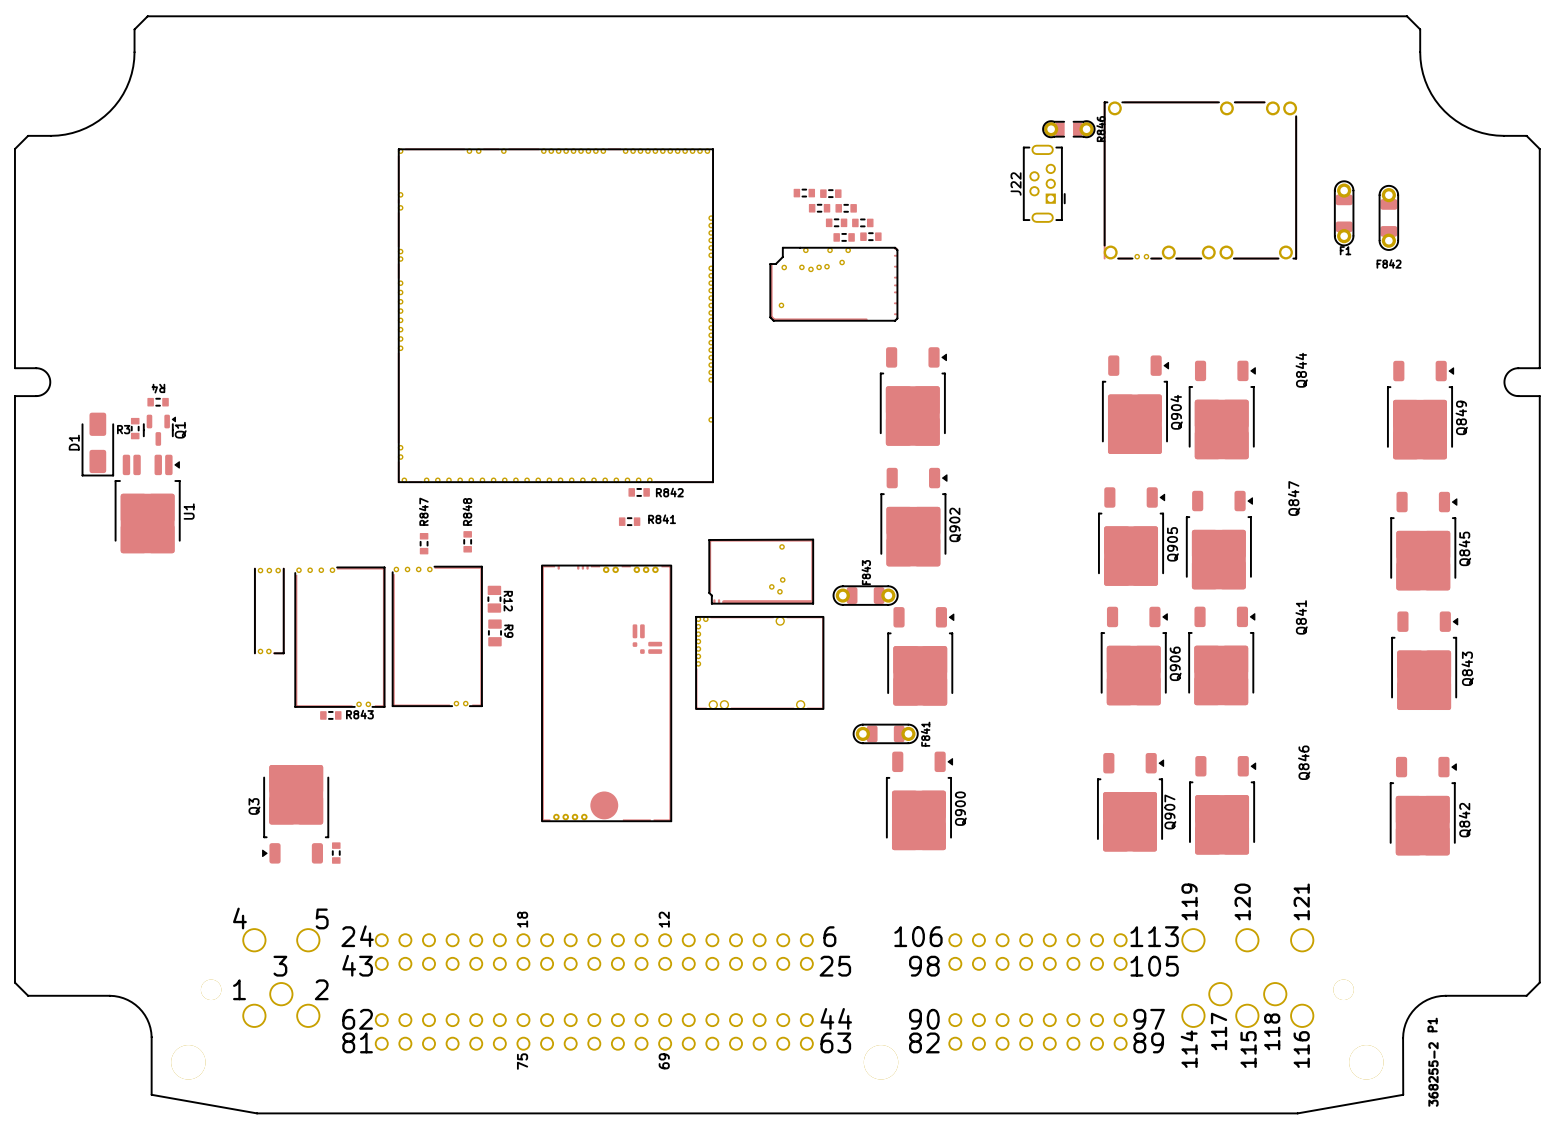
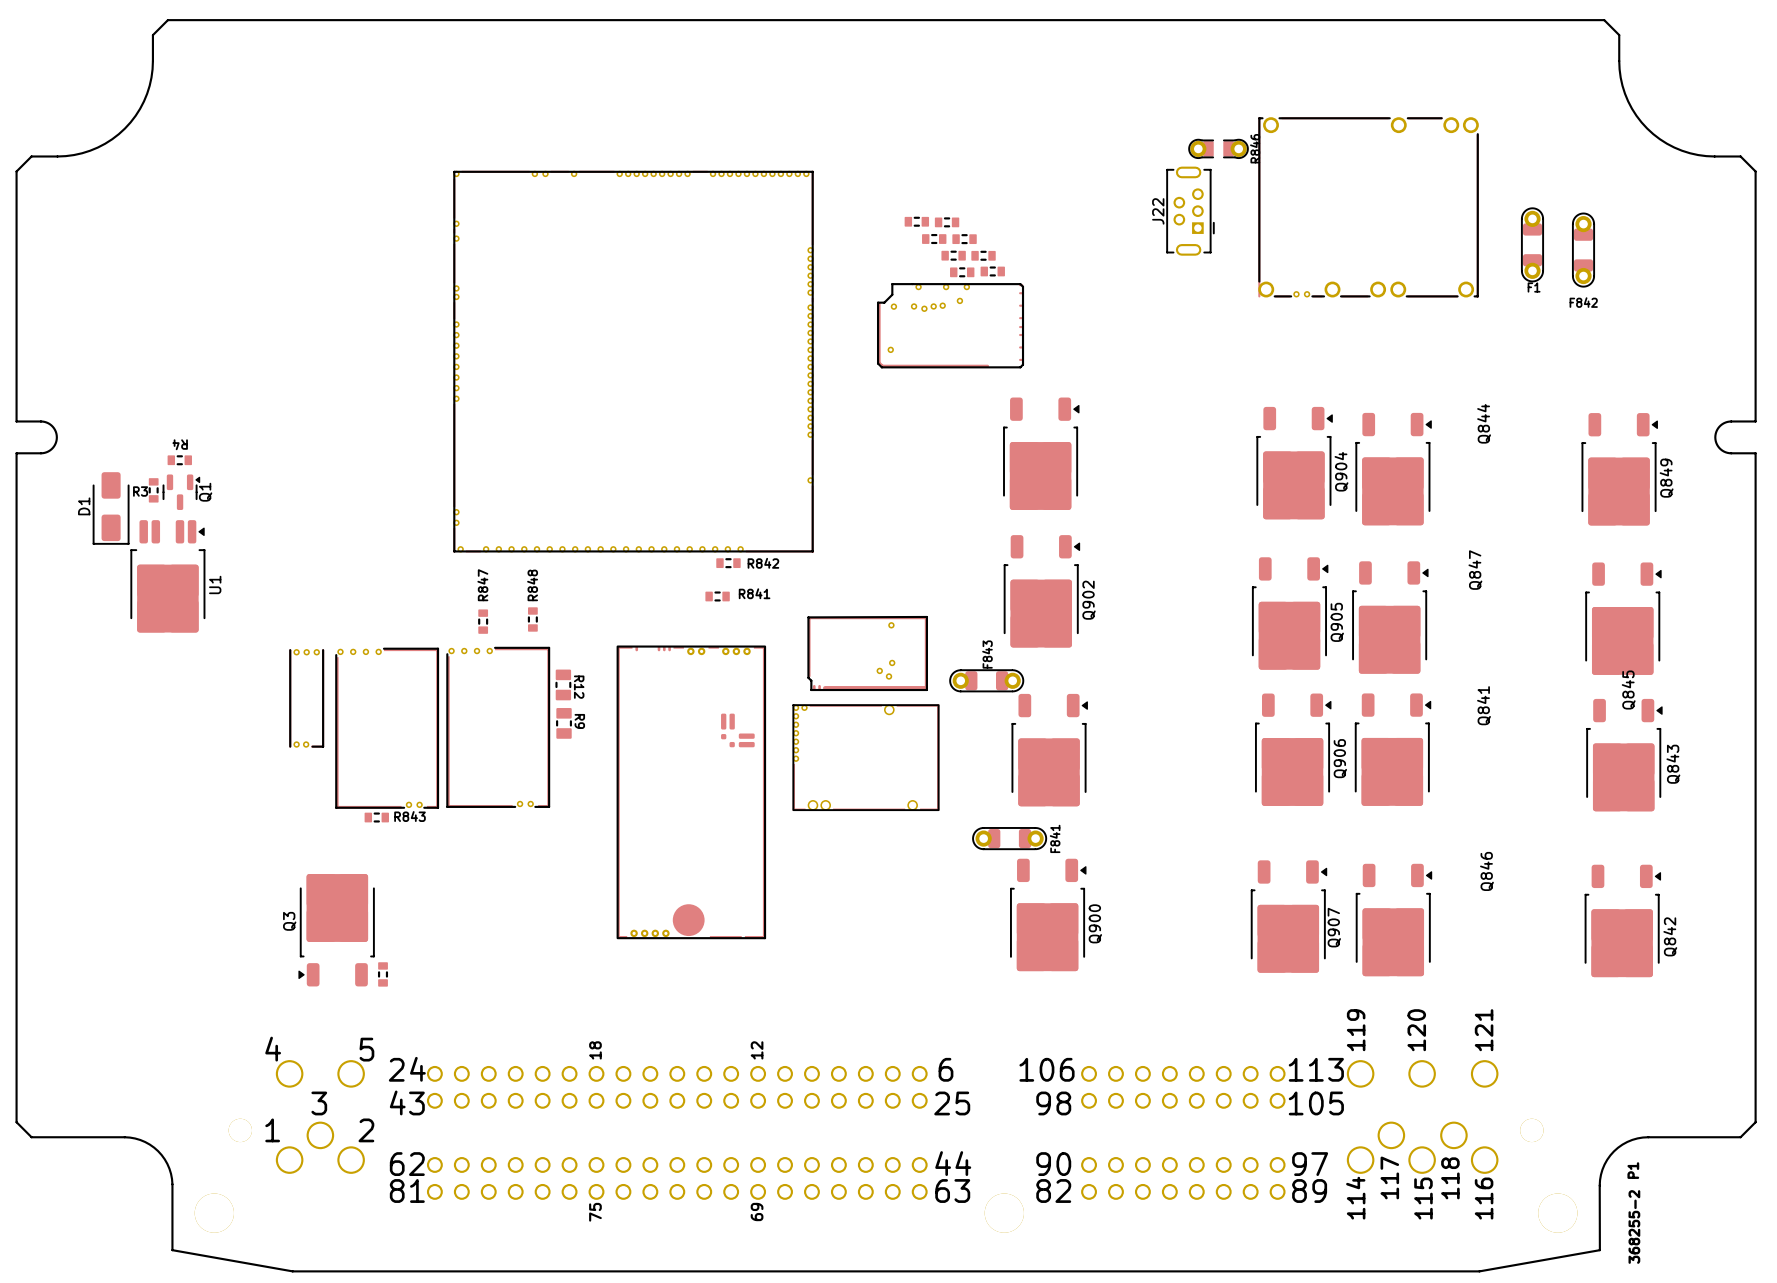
Q845 name position: Q845 (1464, 548) -> Q845 (1628, 690)

